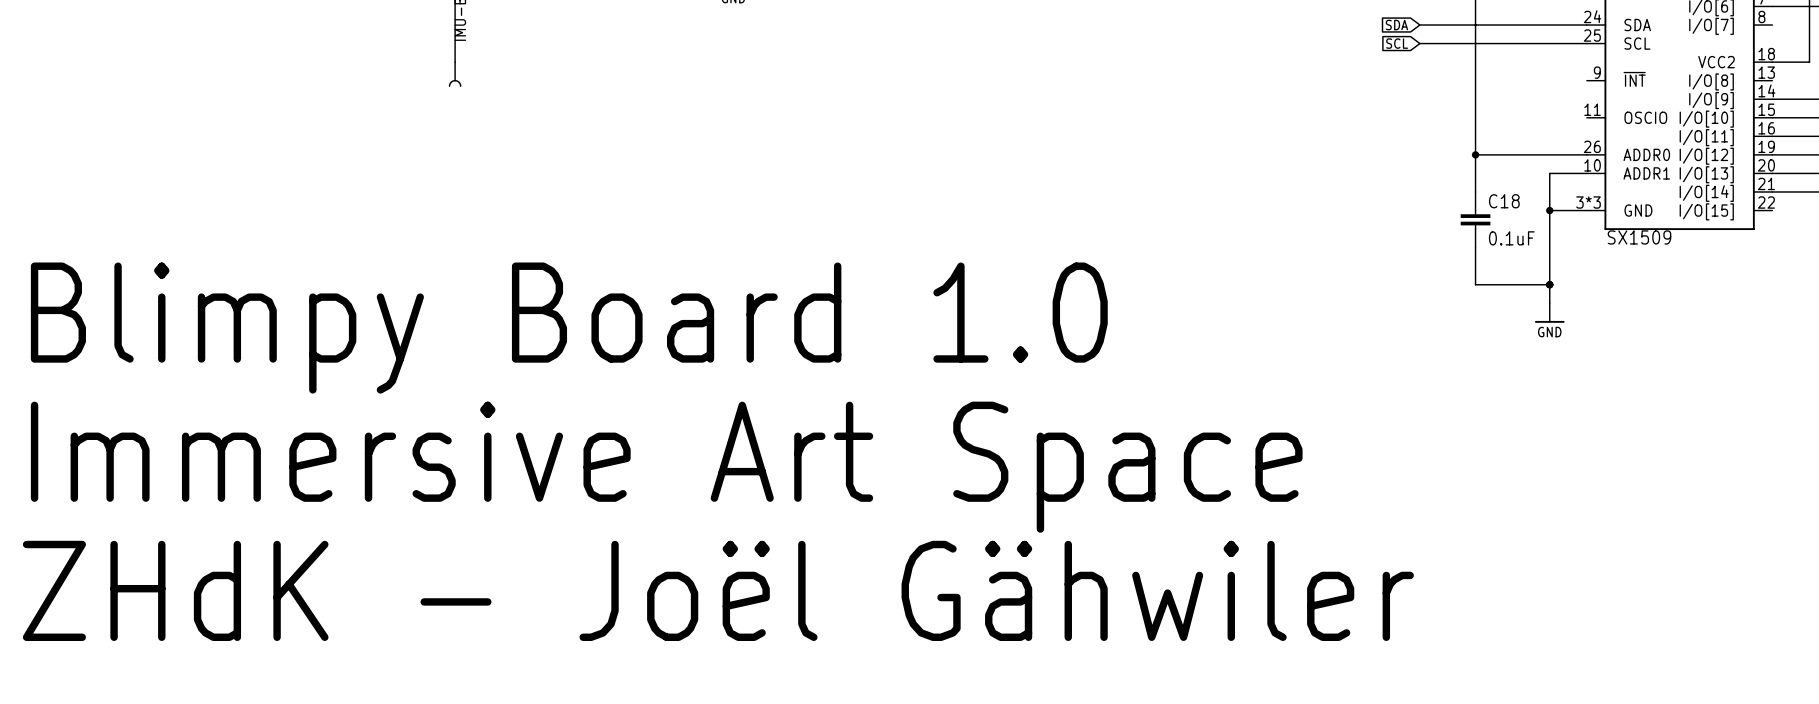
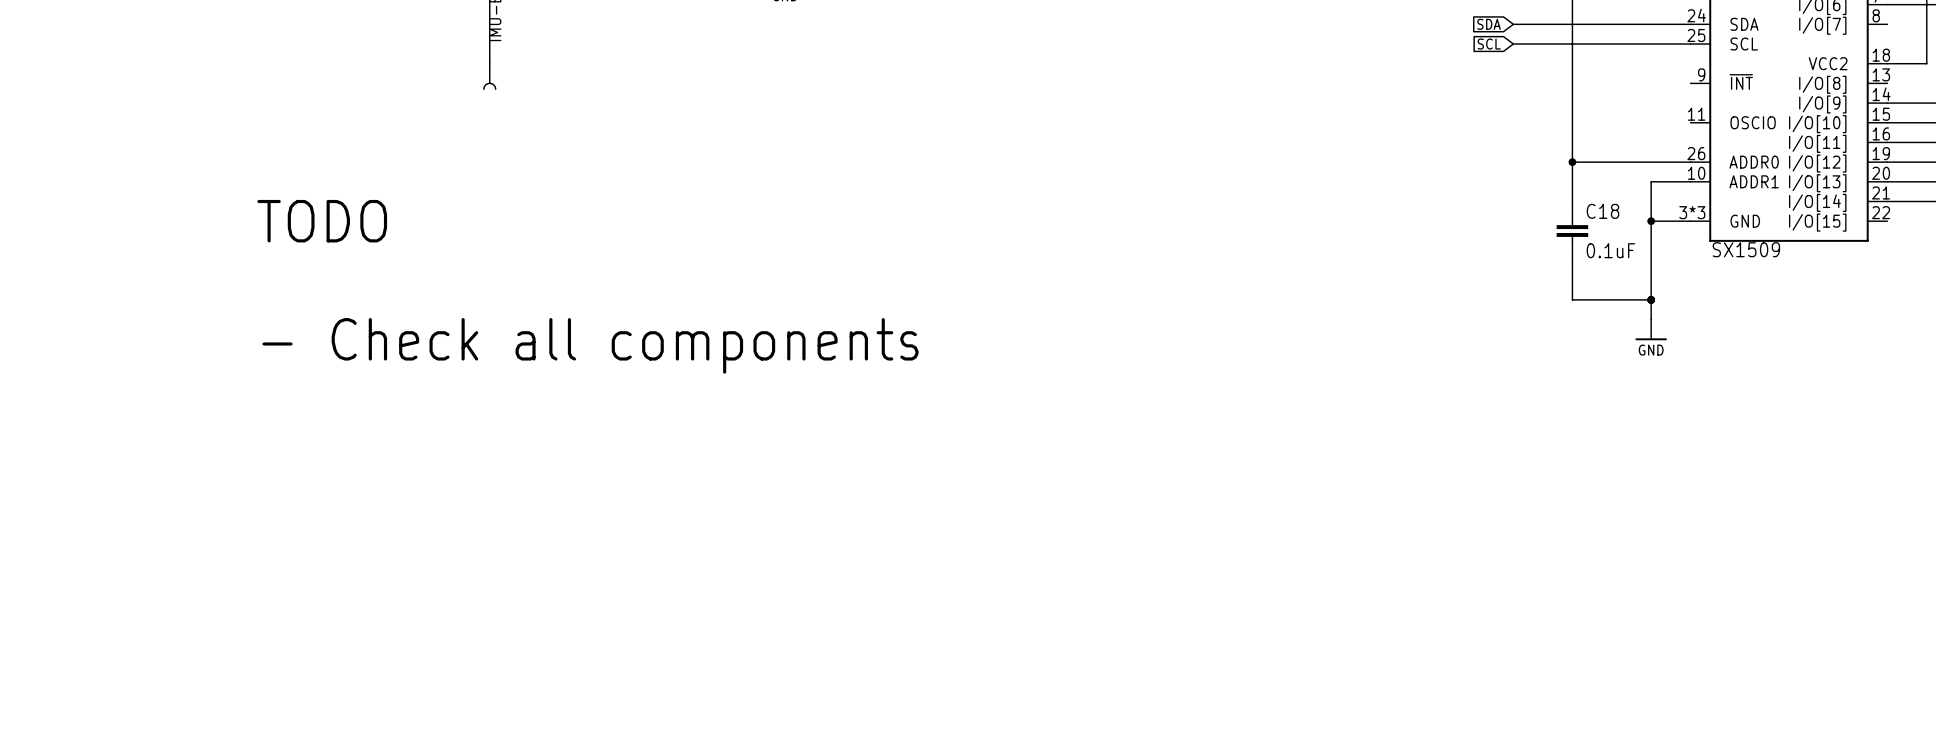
text: none -> TODO (322, 221)
text: none -> - Check all components (590, 345)
text: Blimpy Board 1.0 (569, 328) -> none
text: Immersive Art Space (666, 467) -> none
text: ZHdK - Joël Gähwiler (718, 590) -> none

